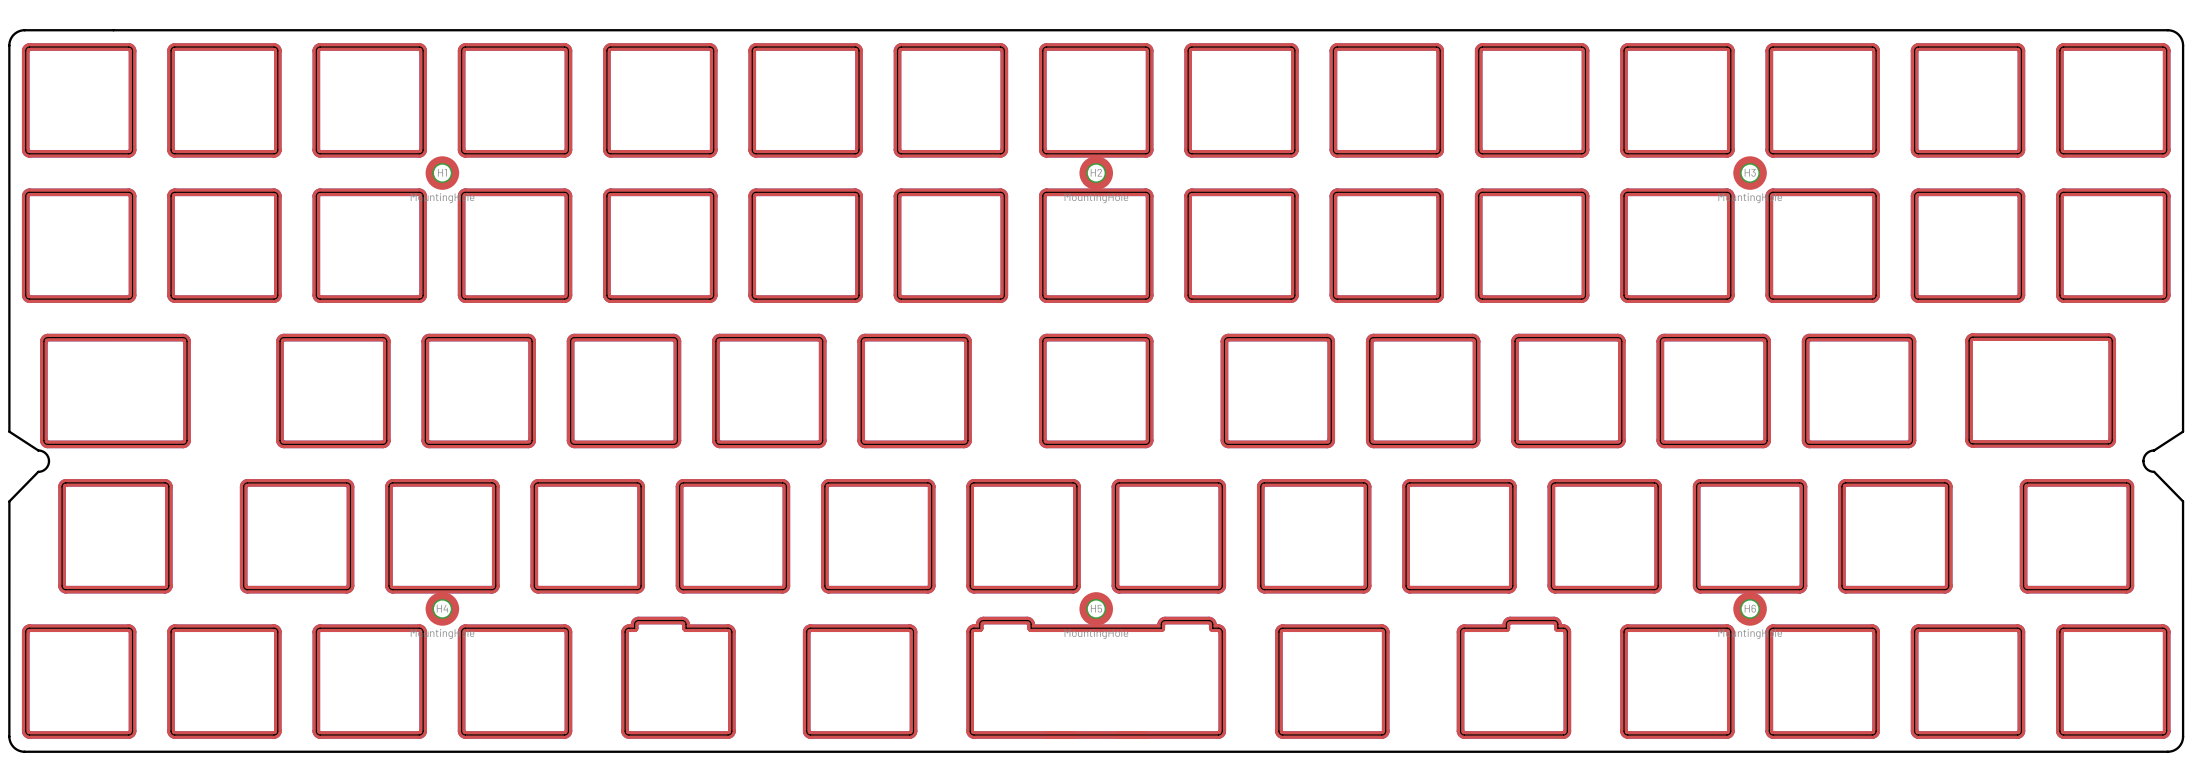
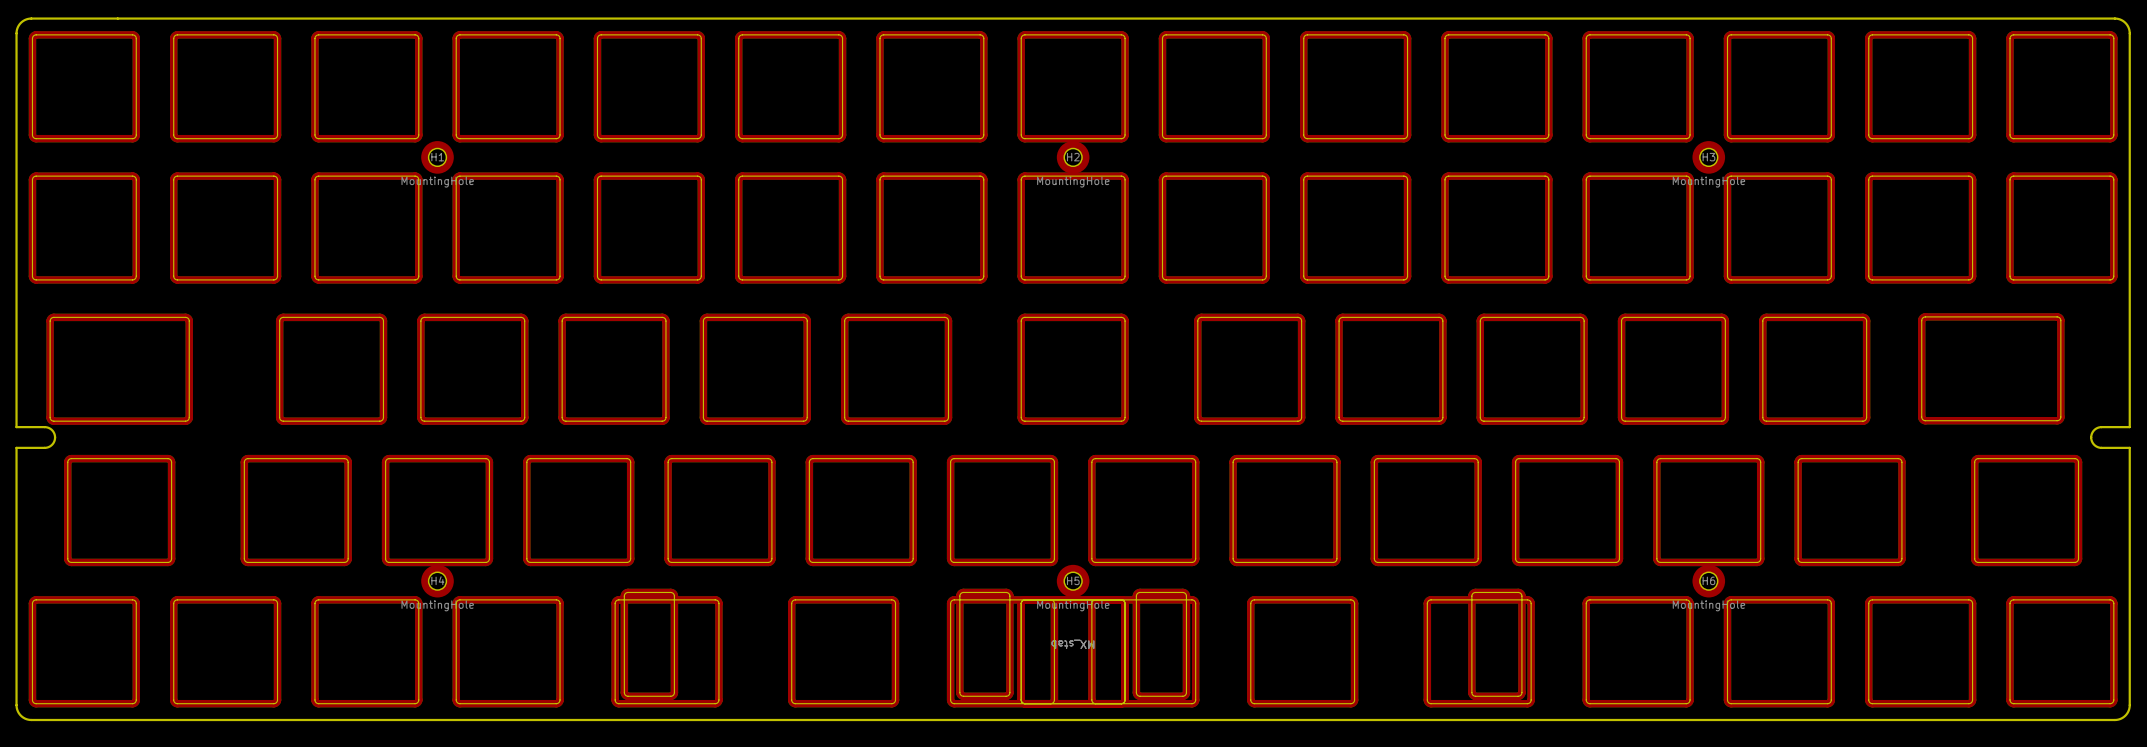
drawing shape: [8, 29, 2185, 753] -> [15, 17, 2131, 722]
drawing: [621, 616, 1572, 739] -> none
drawing: none -> [611, 588, 1535, 708]

